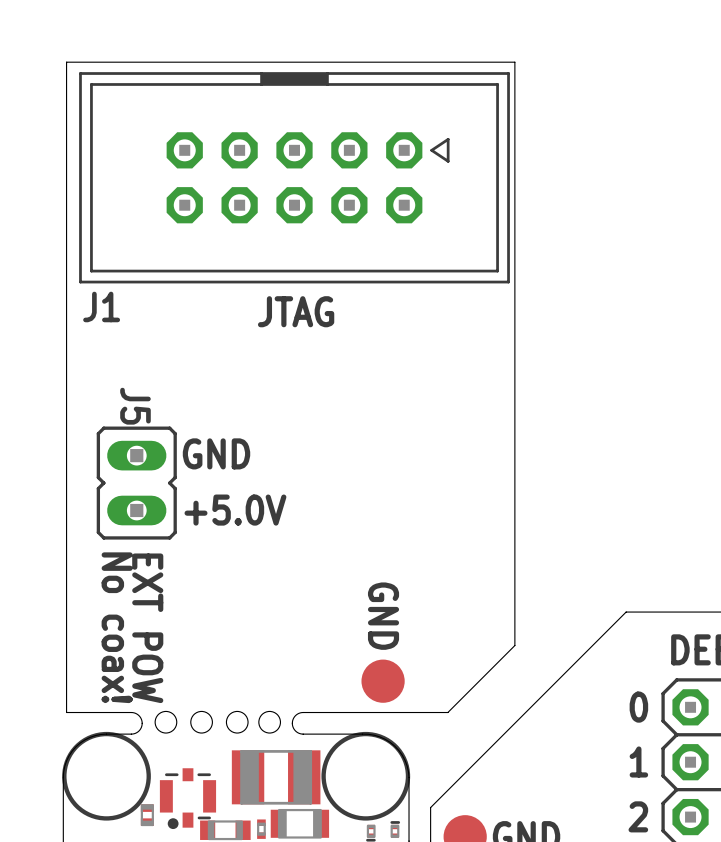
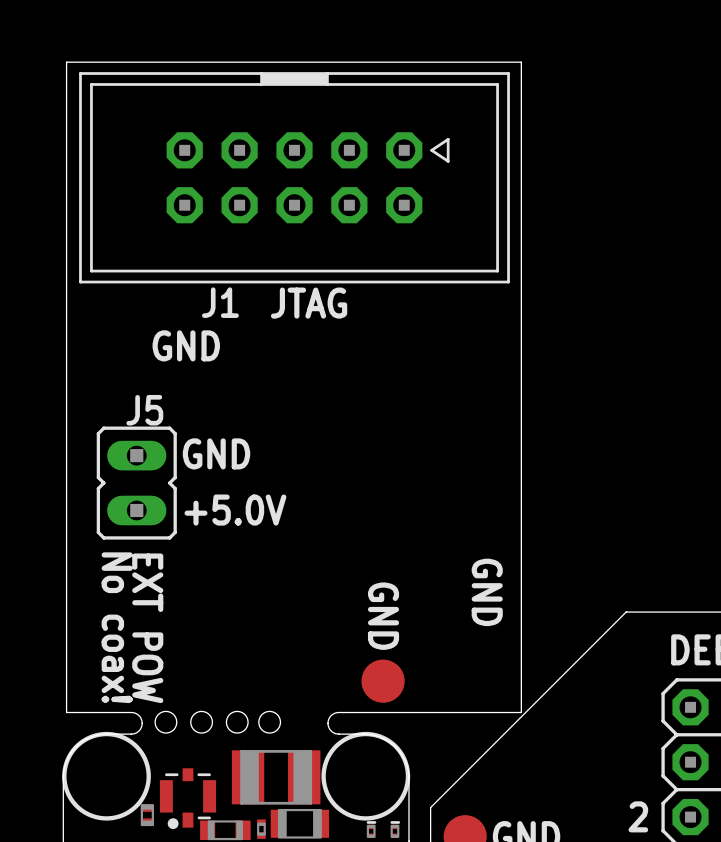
board edge: (514, 62) (514, 645) (447, 712) -> (514, 62) (521, 62) (521, 712) (447, 712)
J1 name position: J1 (101, 306) -> J1 (220, 302)
text position: JTAG (296, 311) -> JTAG (309, 303)
text: none -> GND (186, 345)
J5 name rotation: 0° (135, 406) -> 90° counterclockwise (144, 410)
text: none -> GND (487, 592)
text: 0 (638, 707) -> none
board edge: (338, 712) (300, 712) (294, 716) (292, 723) (294, 729) (300, 733) (338, 734) -> (338, 712) (331, 715) (327, 723) (331, 730) (338, 734)
text: 1 (638, 761) -> none
part rotation: 0° (370, 833) -> 180° (371, 829)

